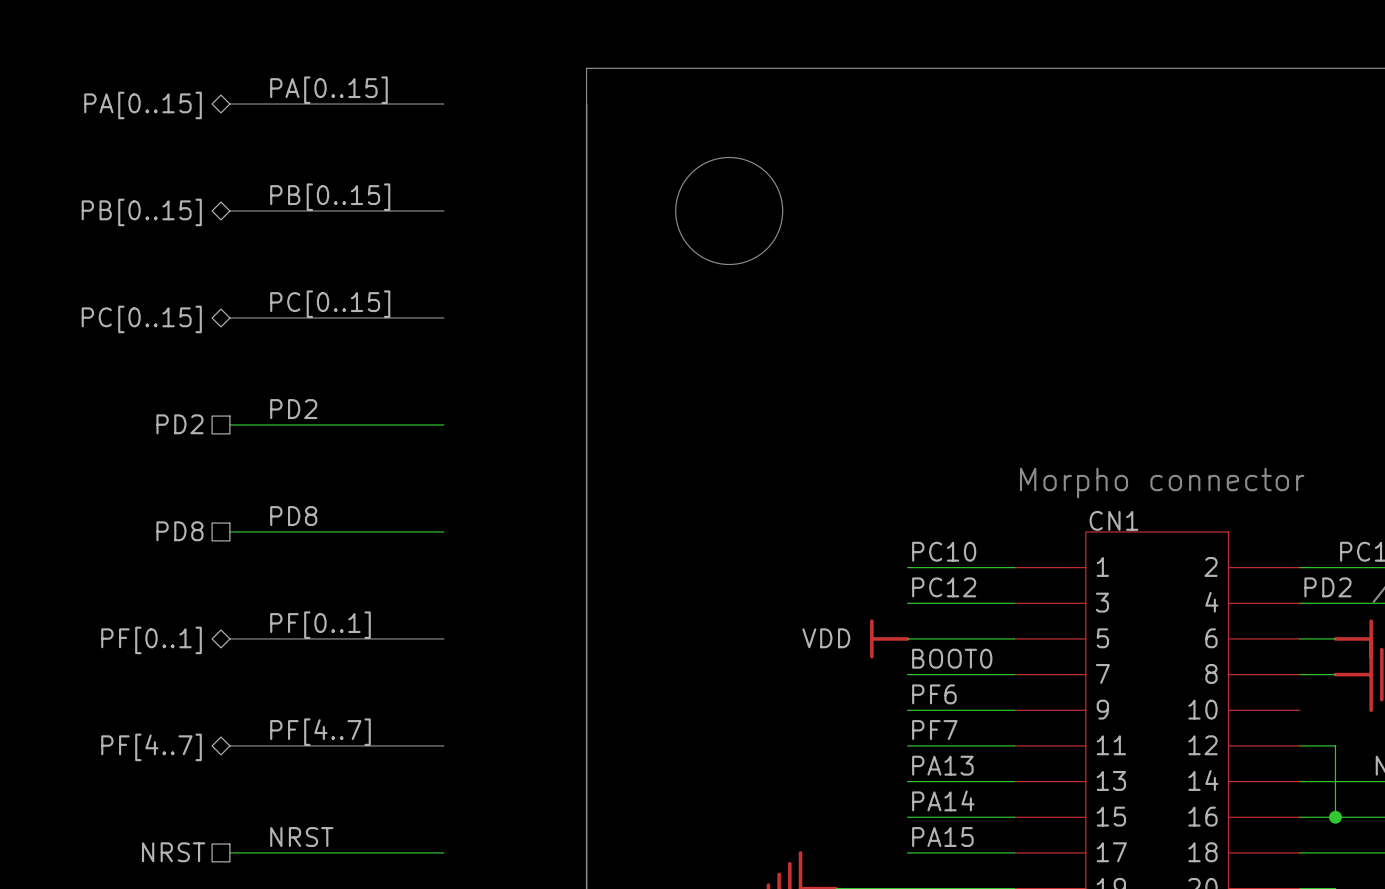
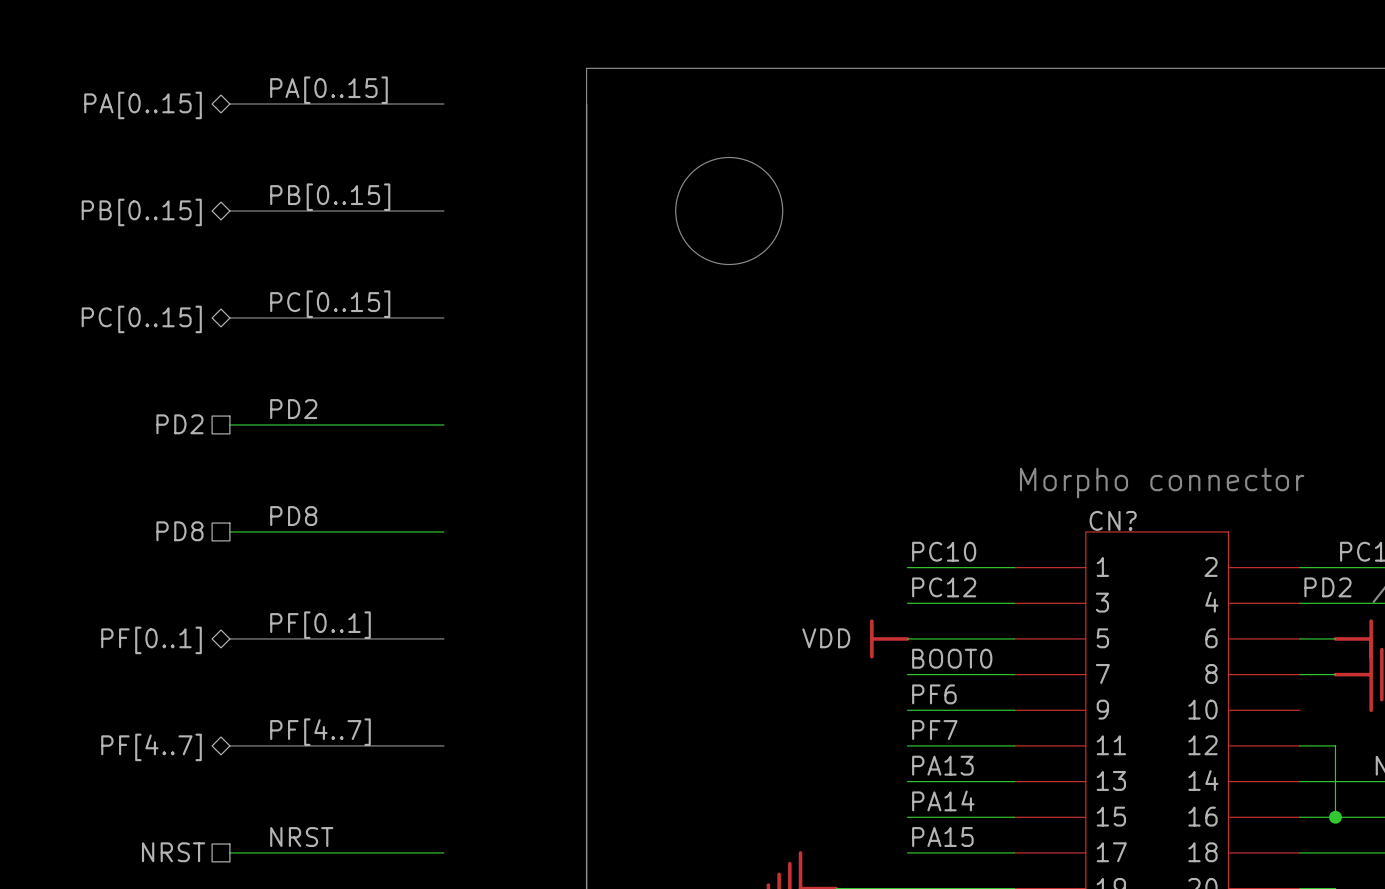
CN1 name: CN1 (1113, 520) -> CN? (1113, 520)

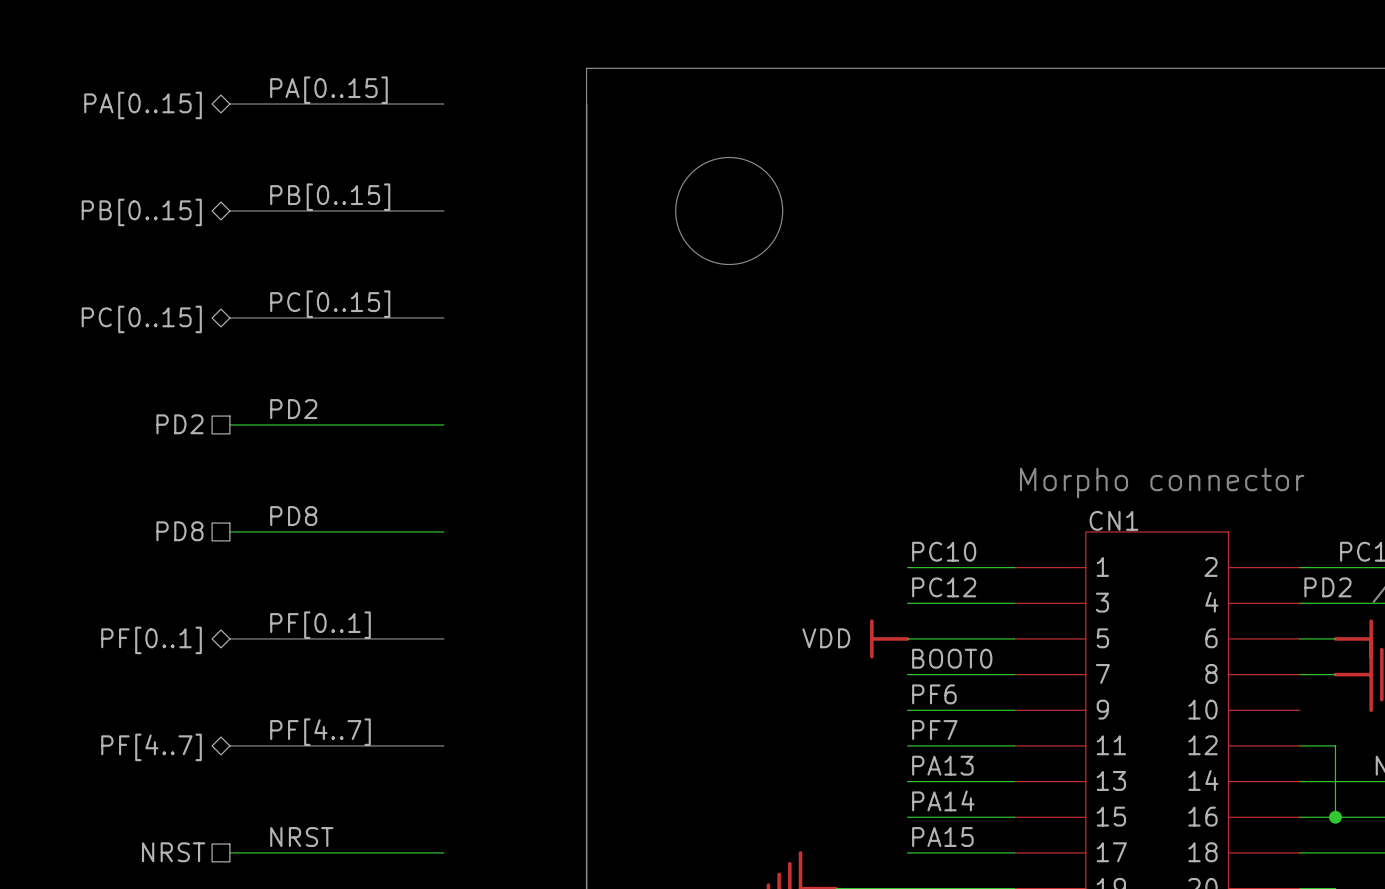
CN? name: CN? (1113, 520) -> CN1 (1113, 520)

